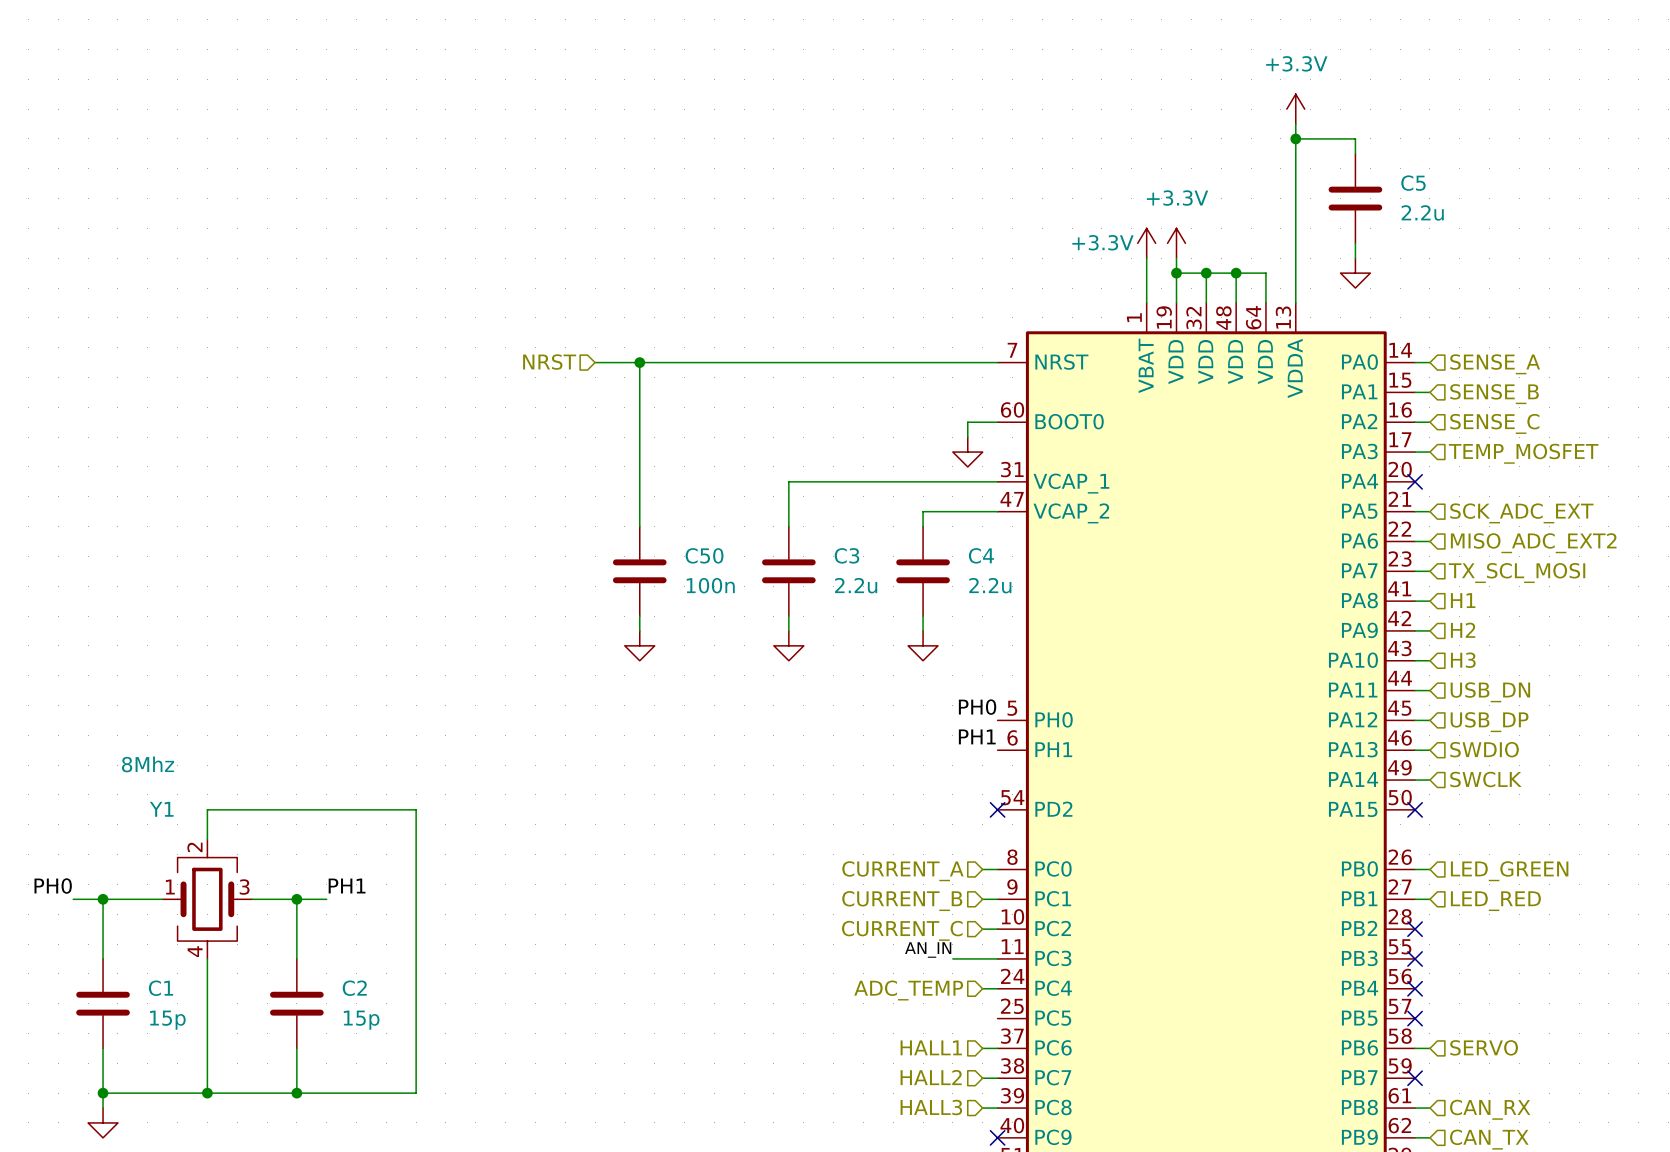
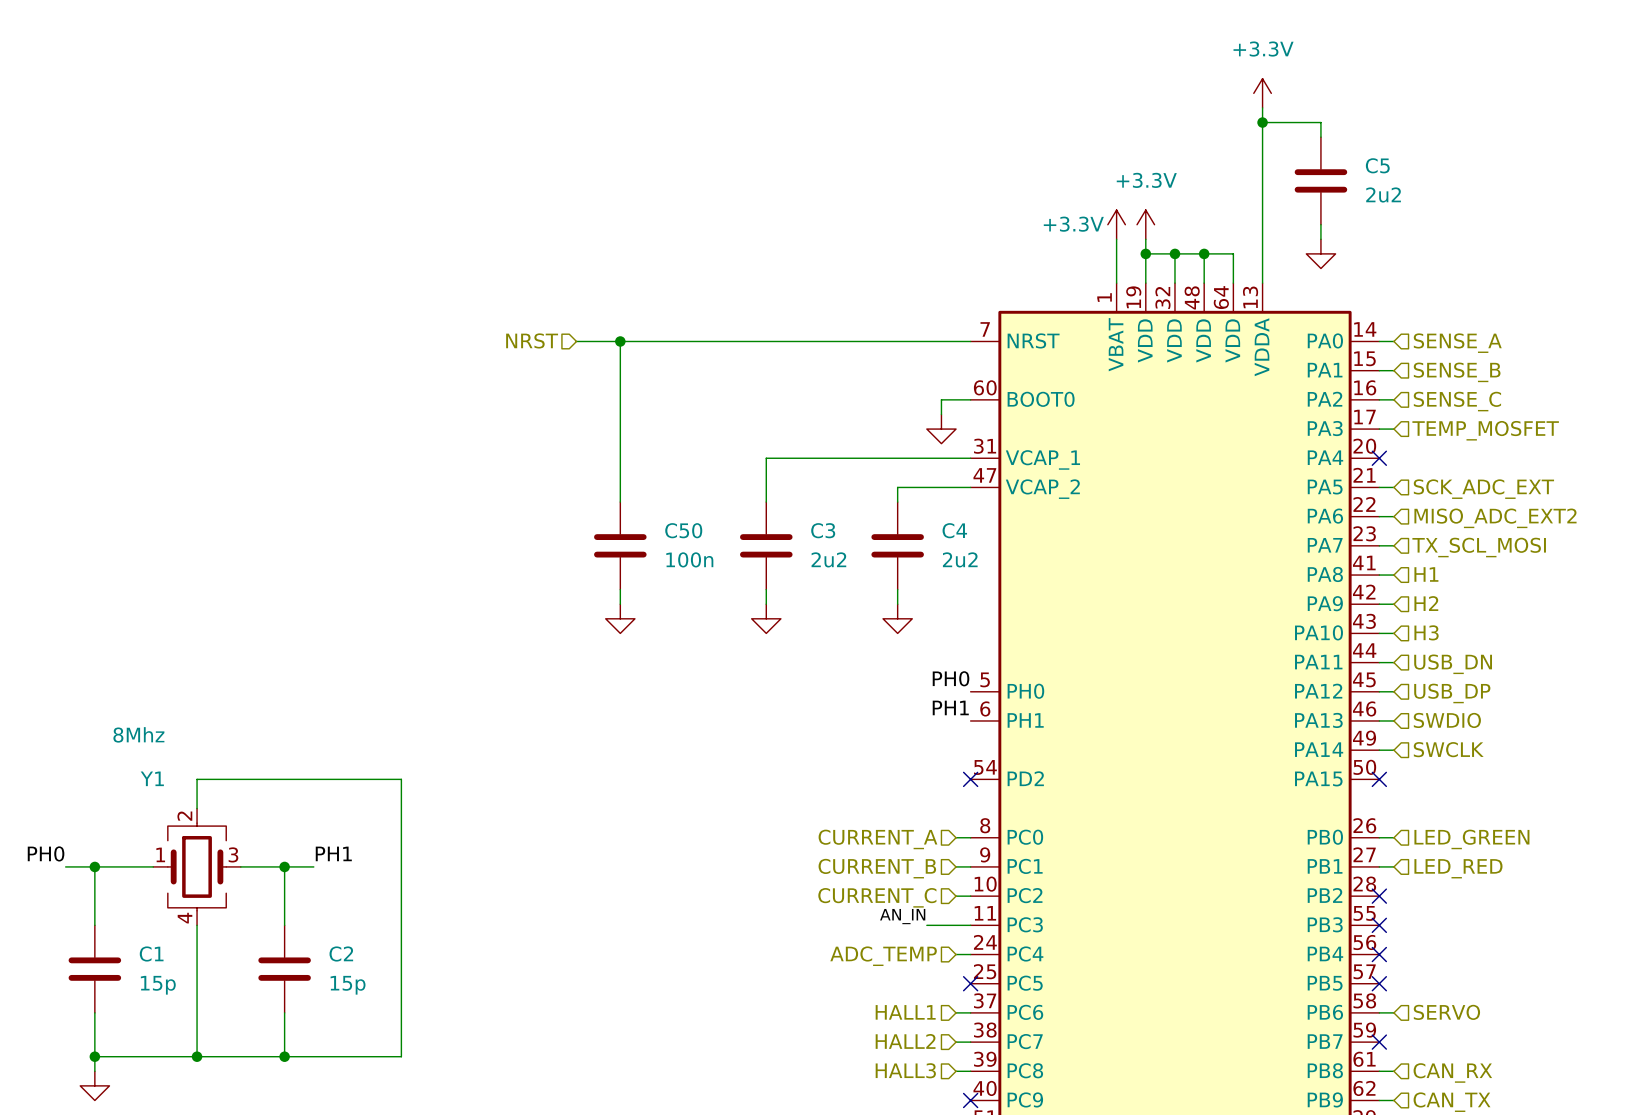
C5 value: 2.2u (1422, 212) -> 2u2 (1383, 194)
C3 value: 2.2u (856, 585) -> 2u2 (828, 559)
C4 value: 2.2u (990, 585) -> 2u2 (960, 559)
no-connect mark: none -> (970, 983)

